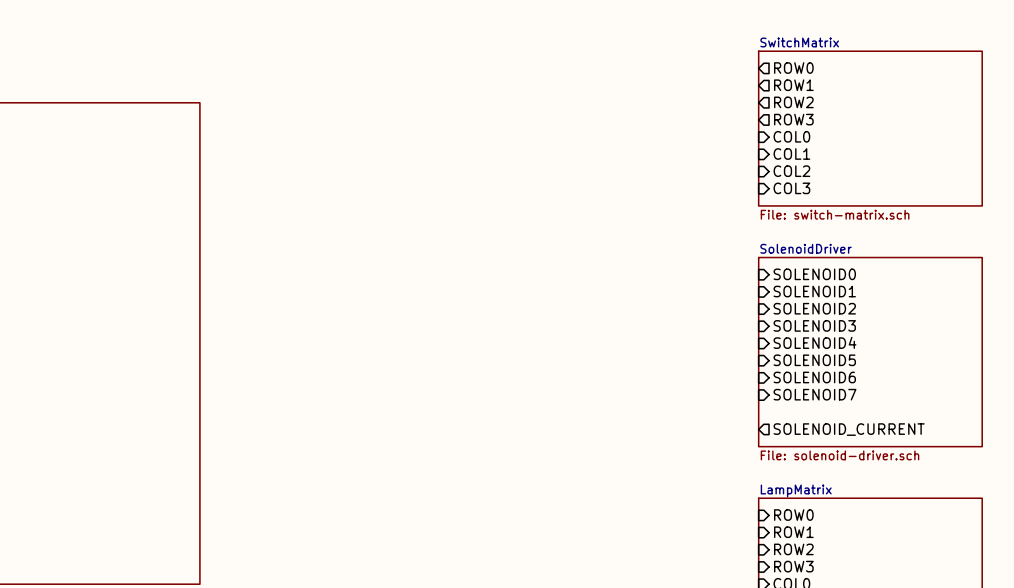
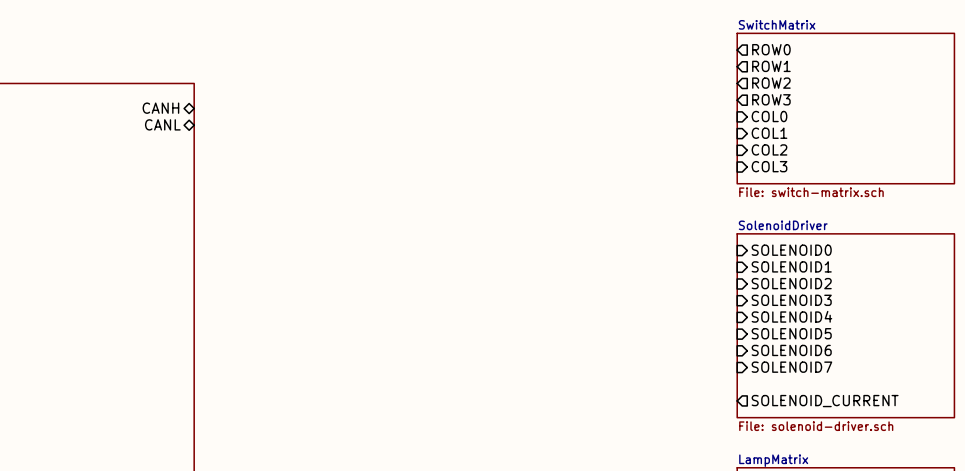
sheet pin: none -> CANH (160, 108)
sheet pin: none -> CANL (162, 124)

